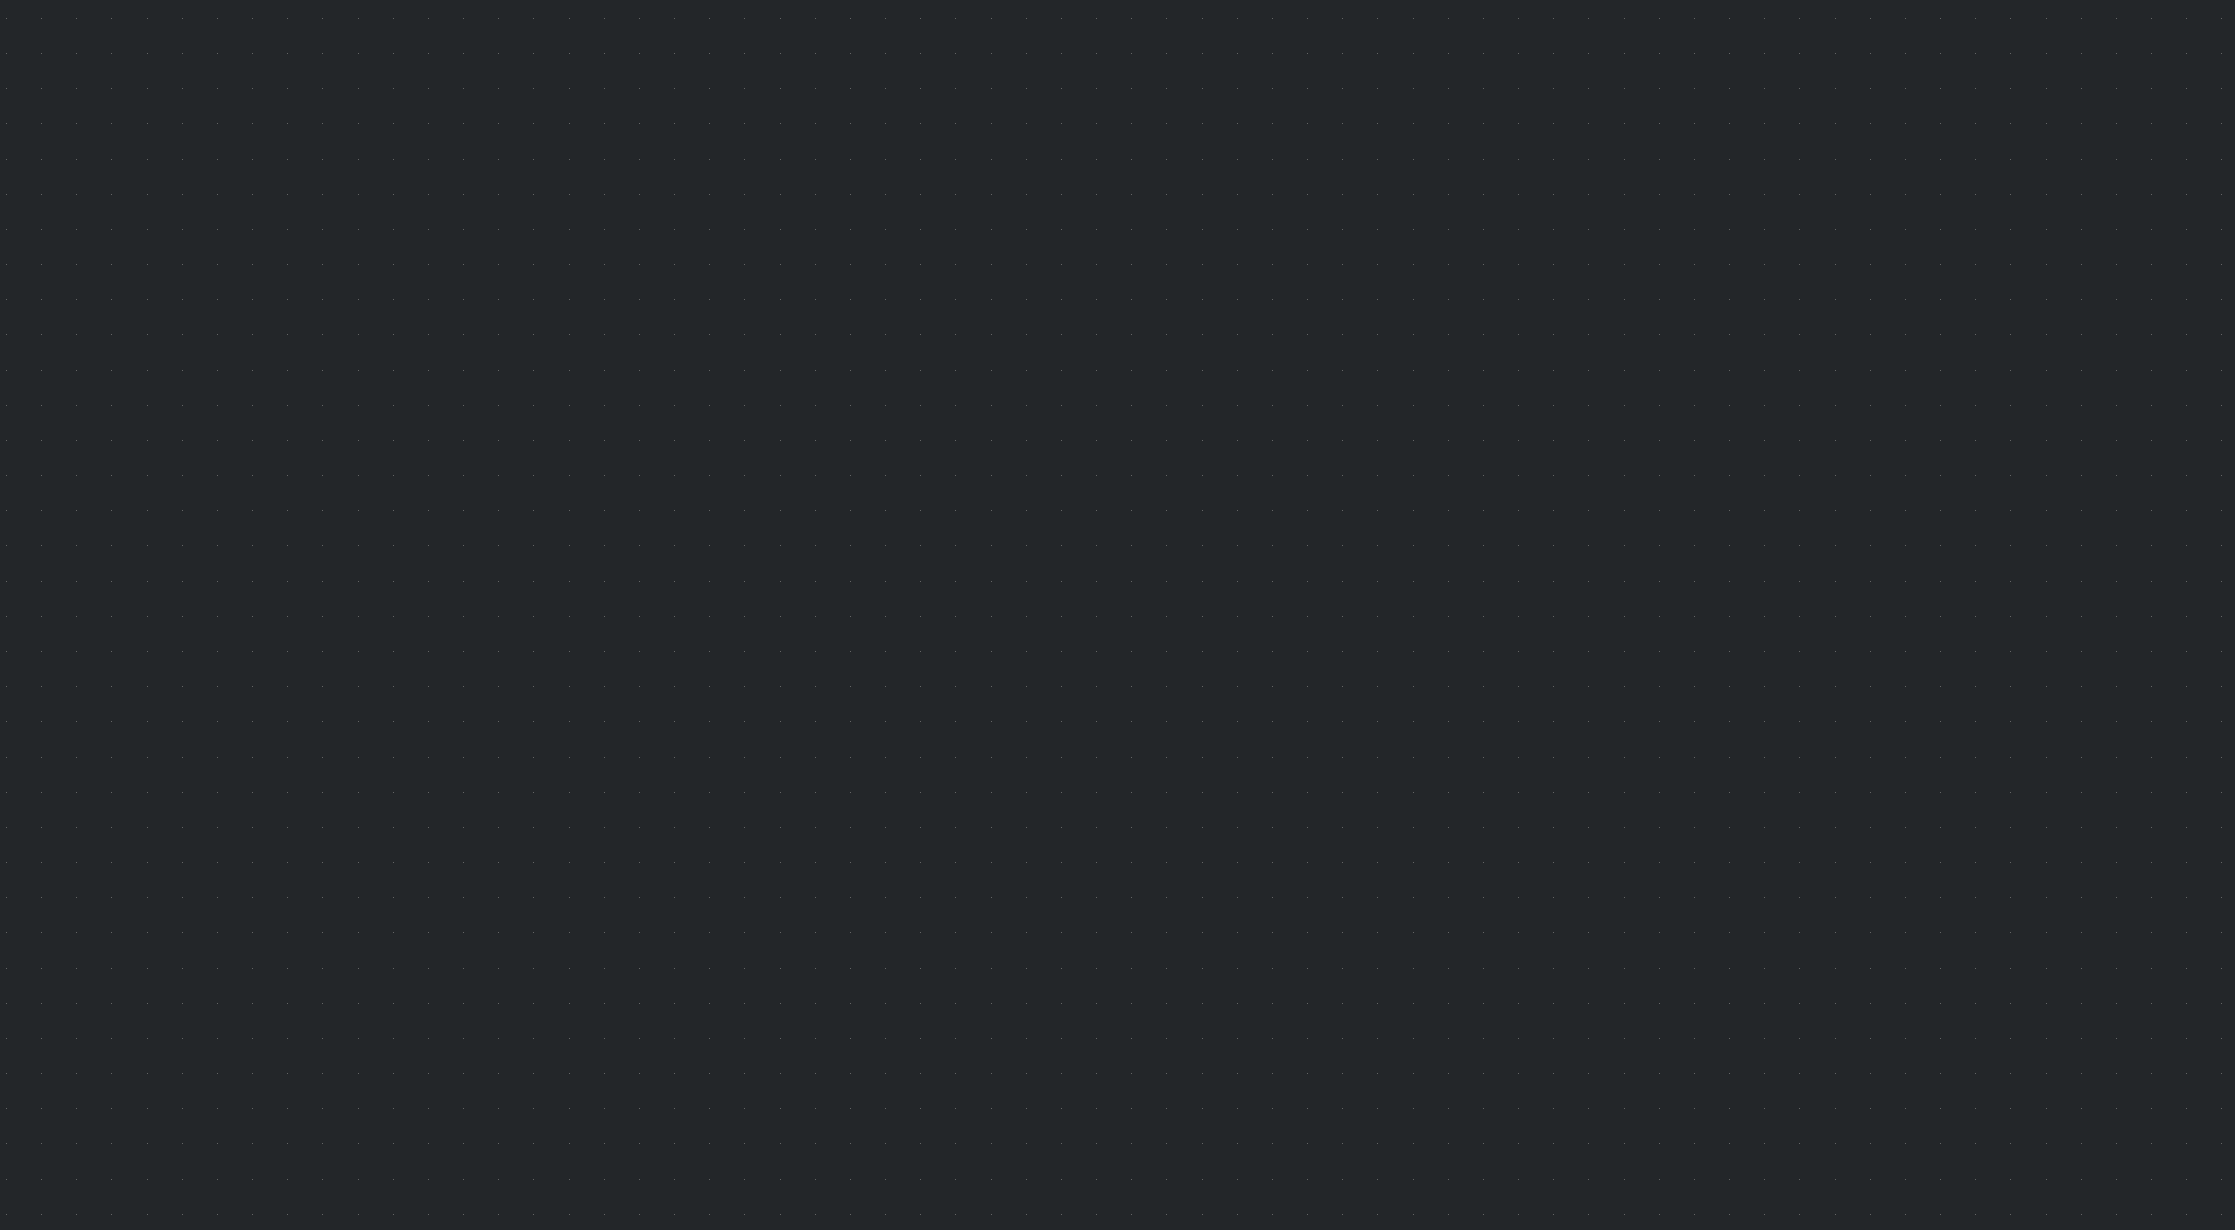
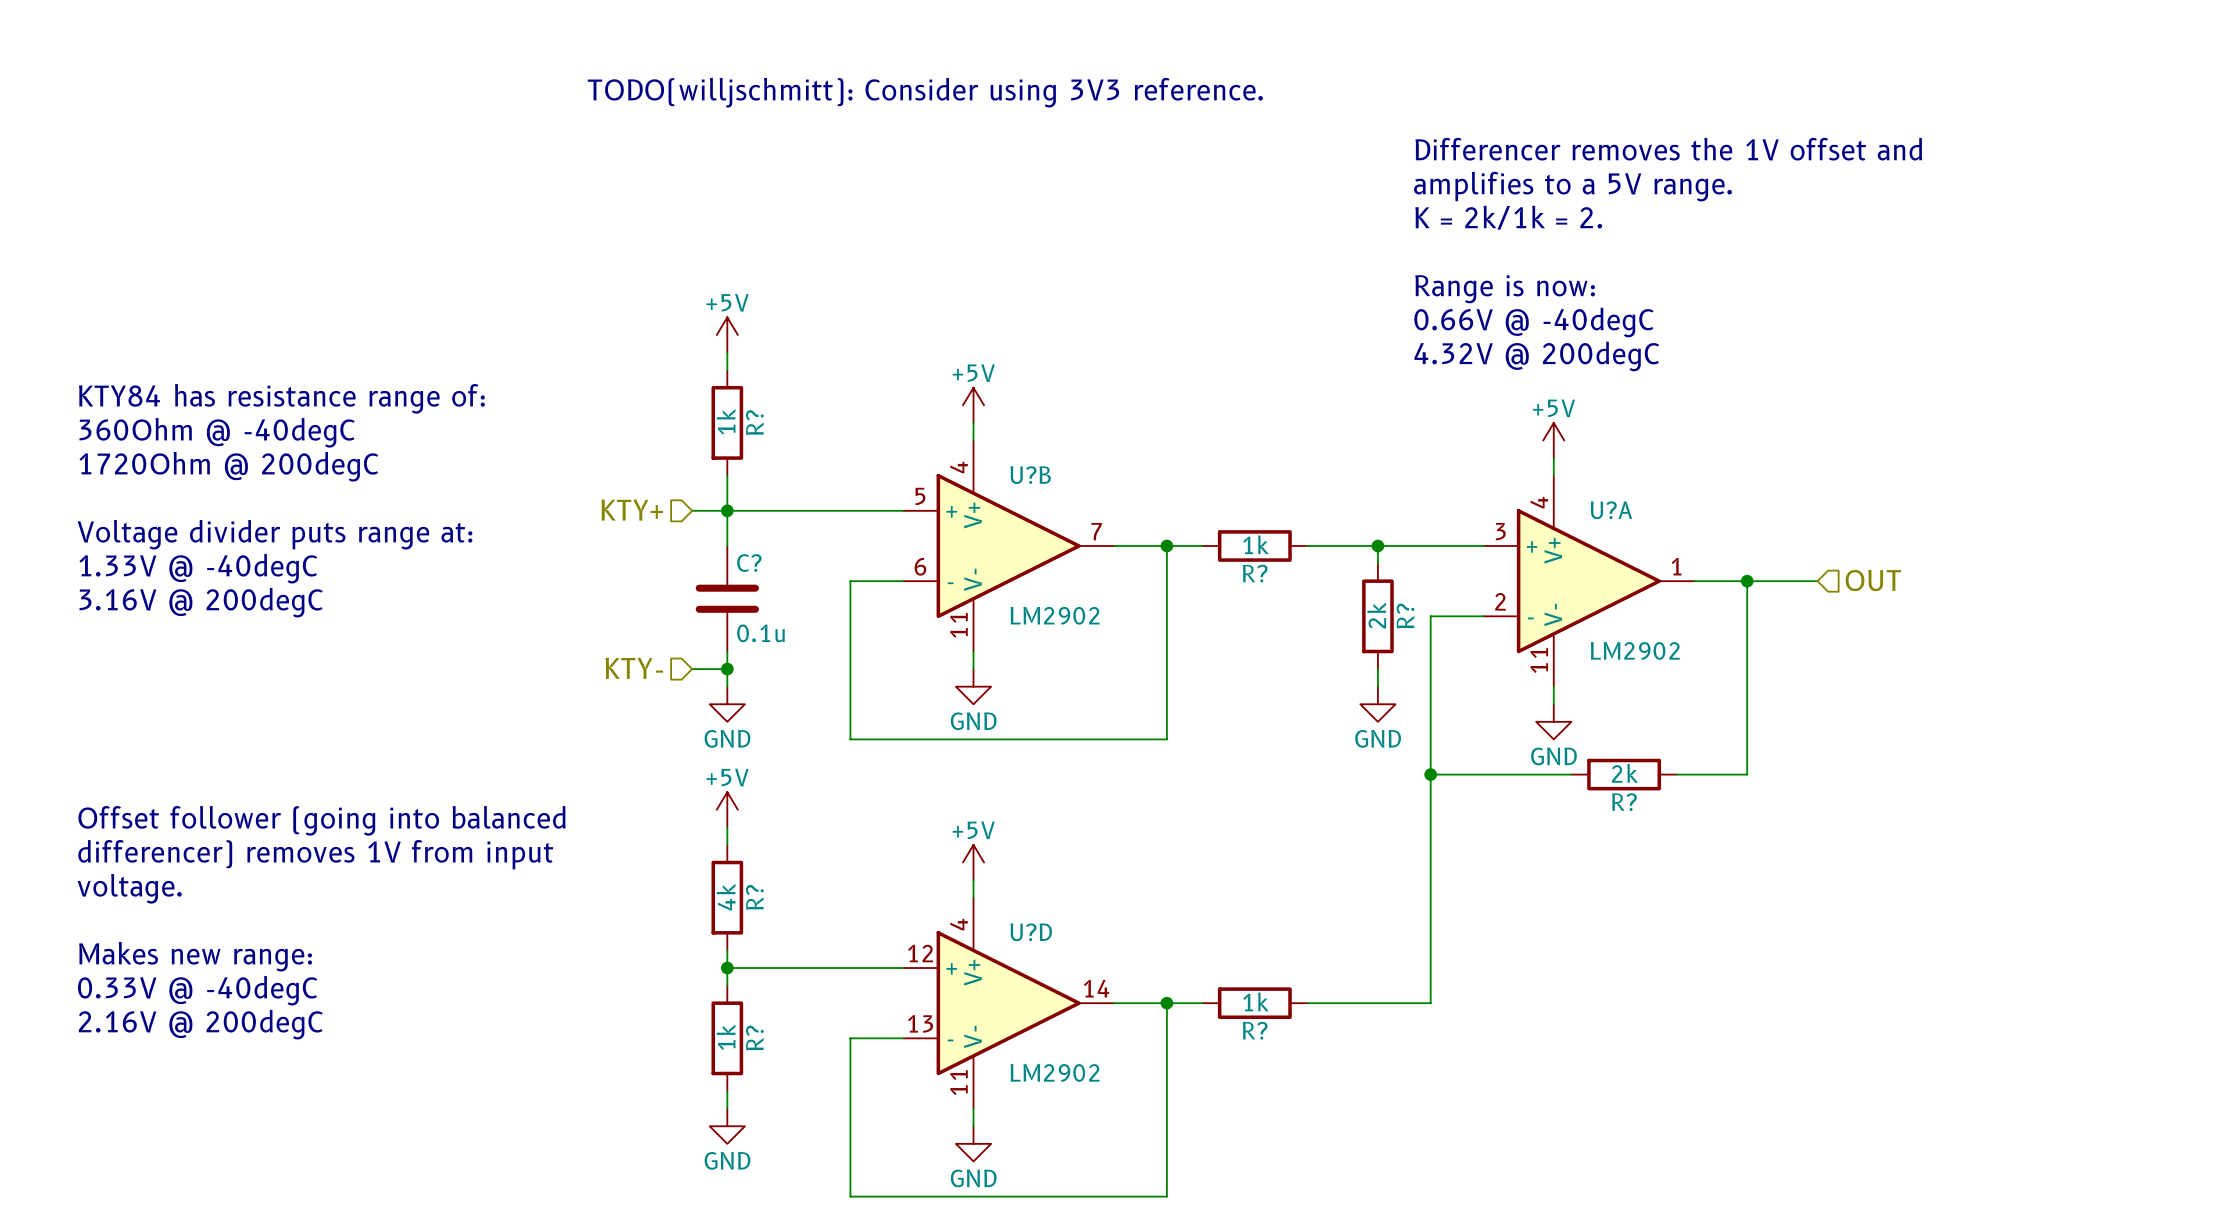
text: none -> TODO(willjschmitt): Consider using 3V3 reference. (925, 92)
text: none -> Differencer removes the 1V offset and (1668, 149)
text: none -> amplifies to a 5V range. (1572, 186)
text: none -> K = 2k/1k = 2. (1508, 217)
text: none -> Range is now: (1505, 289)
text: none -> 0.66V @ -40degC (1533, 322)
power symbol: none -> +5V (727, 334)
wire: none -> (727, 352) (727, 370)
text: none -> 4.32V @ 200degC (1536, 356)
text: none -> KTY84 has resistance range of: (281, 398)
power symbol: none -> +5V (973, 405)
R?: none -> 1k (727, 422)
wire: none -> (973, 422) (973, 440)
text: none -> 360Ohm @ -40degC (217, 432)
power symbol: none -> +5V (1553, 440)
wire: none -> (1553, 458) (1553, 475)
text: none -> 1720Ohm @ 200degC (228, 466)
wire: none -> (727, 475) (727, 545)
hierarchical label: none -> KTY+ (632, 510)
wire: none -> (692, 510) (903, 510)
junction: none -> (727, 510)
text: none -> Voltage divider puts range at: (275, 534)
U?B: none -> LM2902 (1008, 545)
wire: none -> (1114, 545) (1202, 545)
wire: none -> (1166, 545) (1166, 739) (850, 739) (850, 581) (903, 581)
junction: none -> (1166, 545)
R?: none -> 1k (1254, 545)
wire: none -> (1307, 545) (1483, 545)
wire: none -> (1377, 545) (1377, 563)
junction: none -> (1377, 545)
text: none -> 1.33V @ -40degC (198, 568)
hierarchical label: none -> OUT (1873, 580)
U?A: none -> LM2902 (1588, 581)
wire: none -> (1694, 581) (1817, 581)
wire: none -> (1747, 581) (1747, 774) (1676, 774)
junction: none -> (1747, 581)
C?: none -> 0.1u (727, 598)
text: none -> 3.16V @ 200degC (201, 602)
R?: none -> 2k (1377, 616)
wire: none -> (1483, 616) (1430, 616) (1430, 1003) (1307, 1003)
wire: none -> (727, 651) (727, 686)
wire: none -> (973, 651) (973, 669)
hierarchical label: none -> KTY- (634, 668)
wire: none -> (692, 669) (727, 669)
junction: none -> (727, 669)
wire: none -> (1377, 669) (1377, 686)
power symbol: none -> GND (973, 686)
wire: none -> (1553, 686) (1553, 704)
power symbol: none -> GND (727, 704)
power symbol: none -> GND (1377, 704)
power symbol: none -> GND (1553, 721)
wire: none -> (1430, 774) (1571, 774)
junction: none -> (1430, 774)
R?: none -> 2k (1624, 774)
power symbol: none -> +5V (727, 809)
text: none -> Offset follower (going into balanced (322, 820)
wire: none -> (727, 827) (727, 844)
text: none -> differencer) removes 1V from input (315, 854)
power symbol: none -> +5V (973, 862)
wire: none -> (973, 880) (973, 897)
text: none -> voltage. (129, 888)
R?: none -> 4k (727, 897)
wire: none -> (727, 950) (727, 985)
text: none -> Makes new range: (195, 956)
wire: none -> (727, 968) (903, 968)
junction: none -> (727, 968)
text: none -> 0.33V @ -40degC (197, 990)
U?D: none -> LM2902 (1008, 1003)
wire: none -> (1114, 1003) (1202, 1003)
wire: none -> (1166, 1003) (1166, 1196) (850, 1196) (850, 1038) (903, 1038)
junction: none -> (1166, 1003)
R?: none -> 1k (1254, 1003)
text: none -> 2.16V @ 200degC (200, 1024)
R?: none -> 1k (727, 1038)
wire: none -> (727, 1091) (727, 1108)
wire: none -> (973, 1108) (973, 1126)
power symbol: none -> GND (727, 1126)
power symbol: none -> GND (973, 1143)

